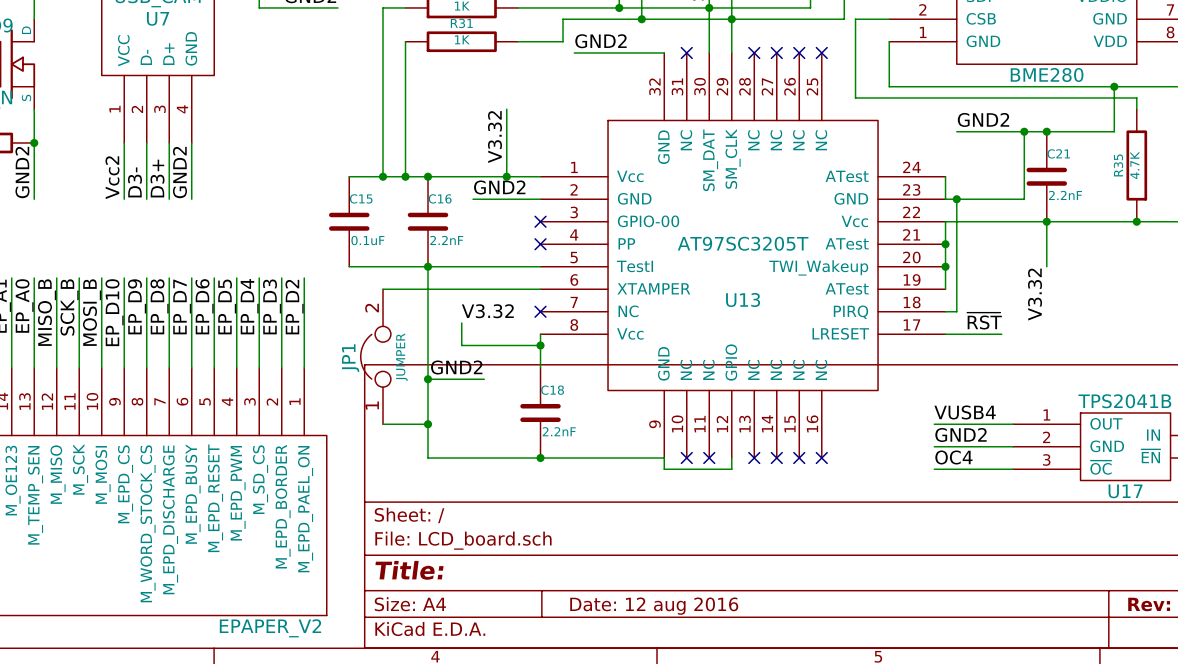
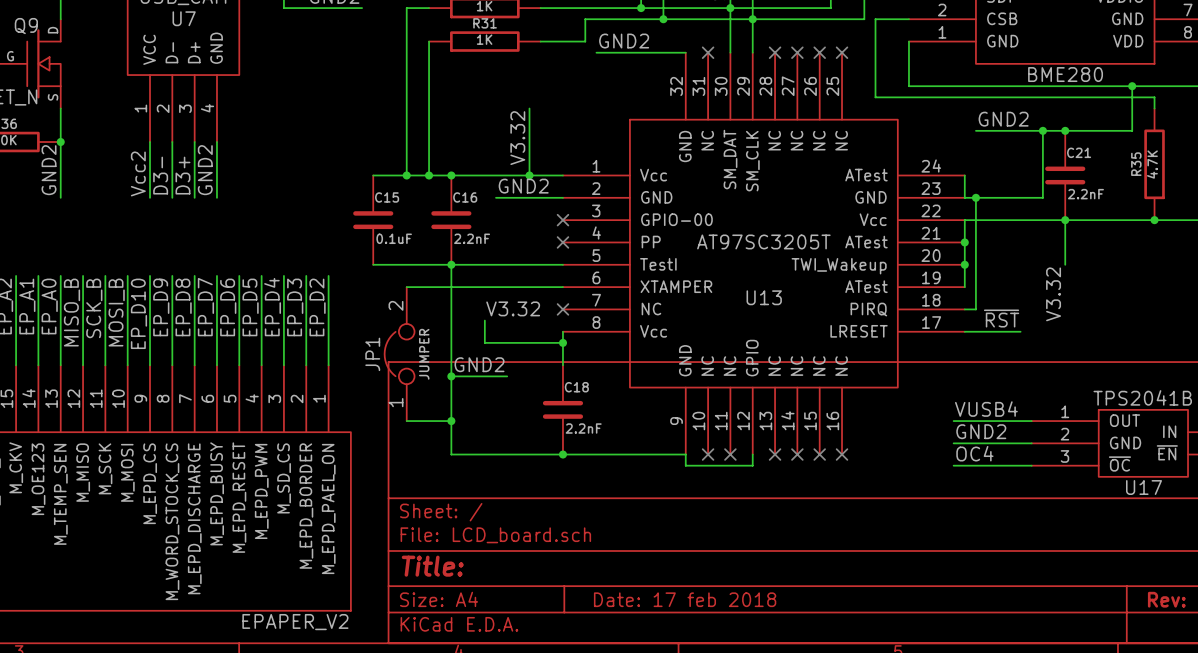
title block: Date: 12 aug 2016 (654, 606) -> Date: 17 feb 2018 (685, 599)

